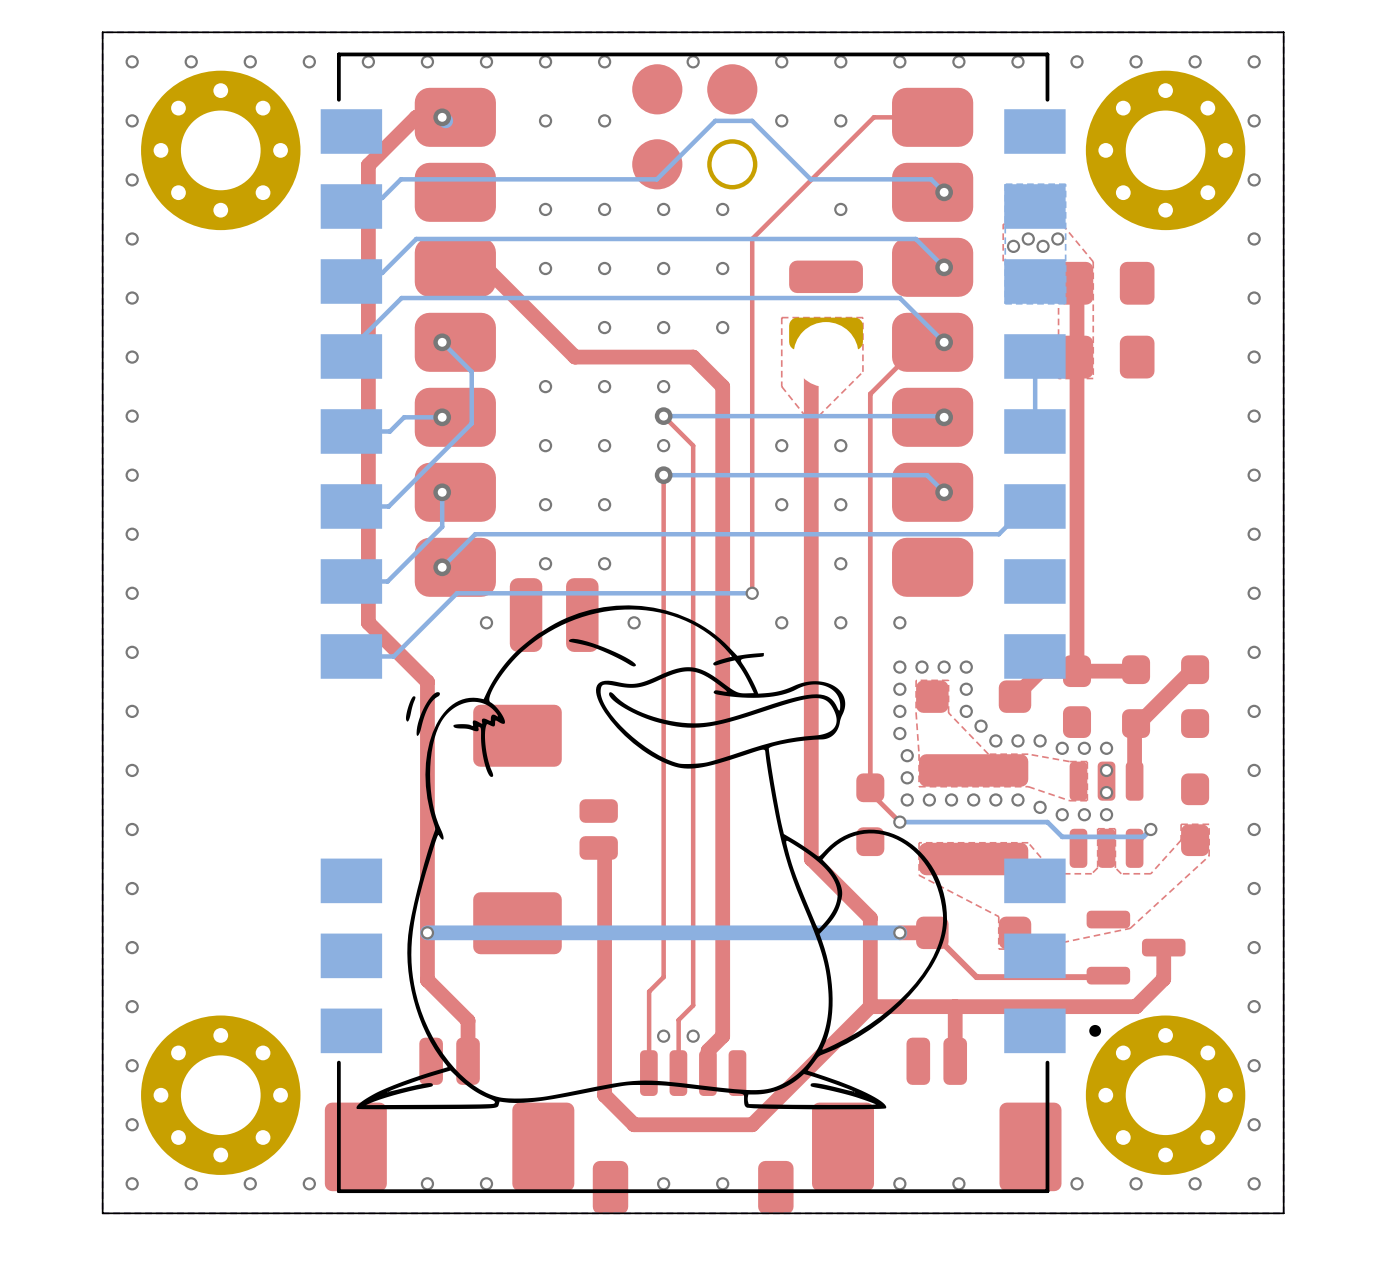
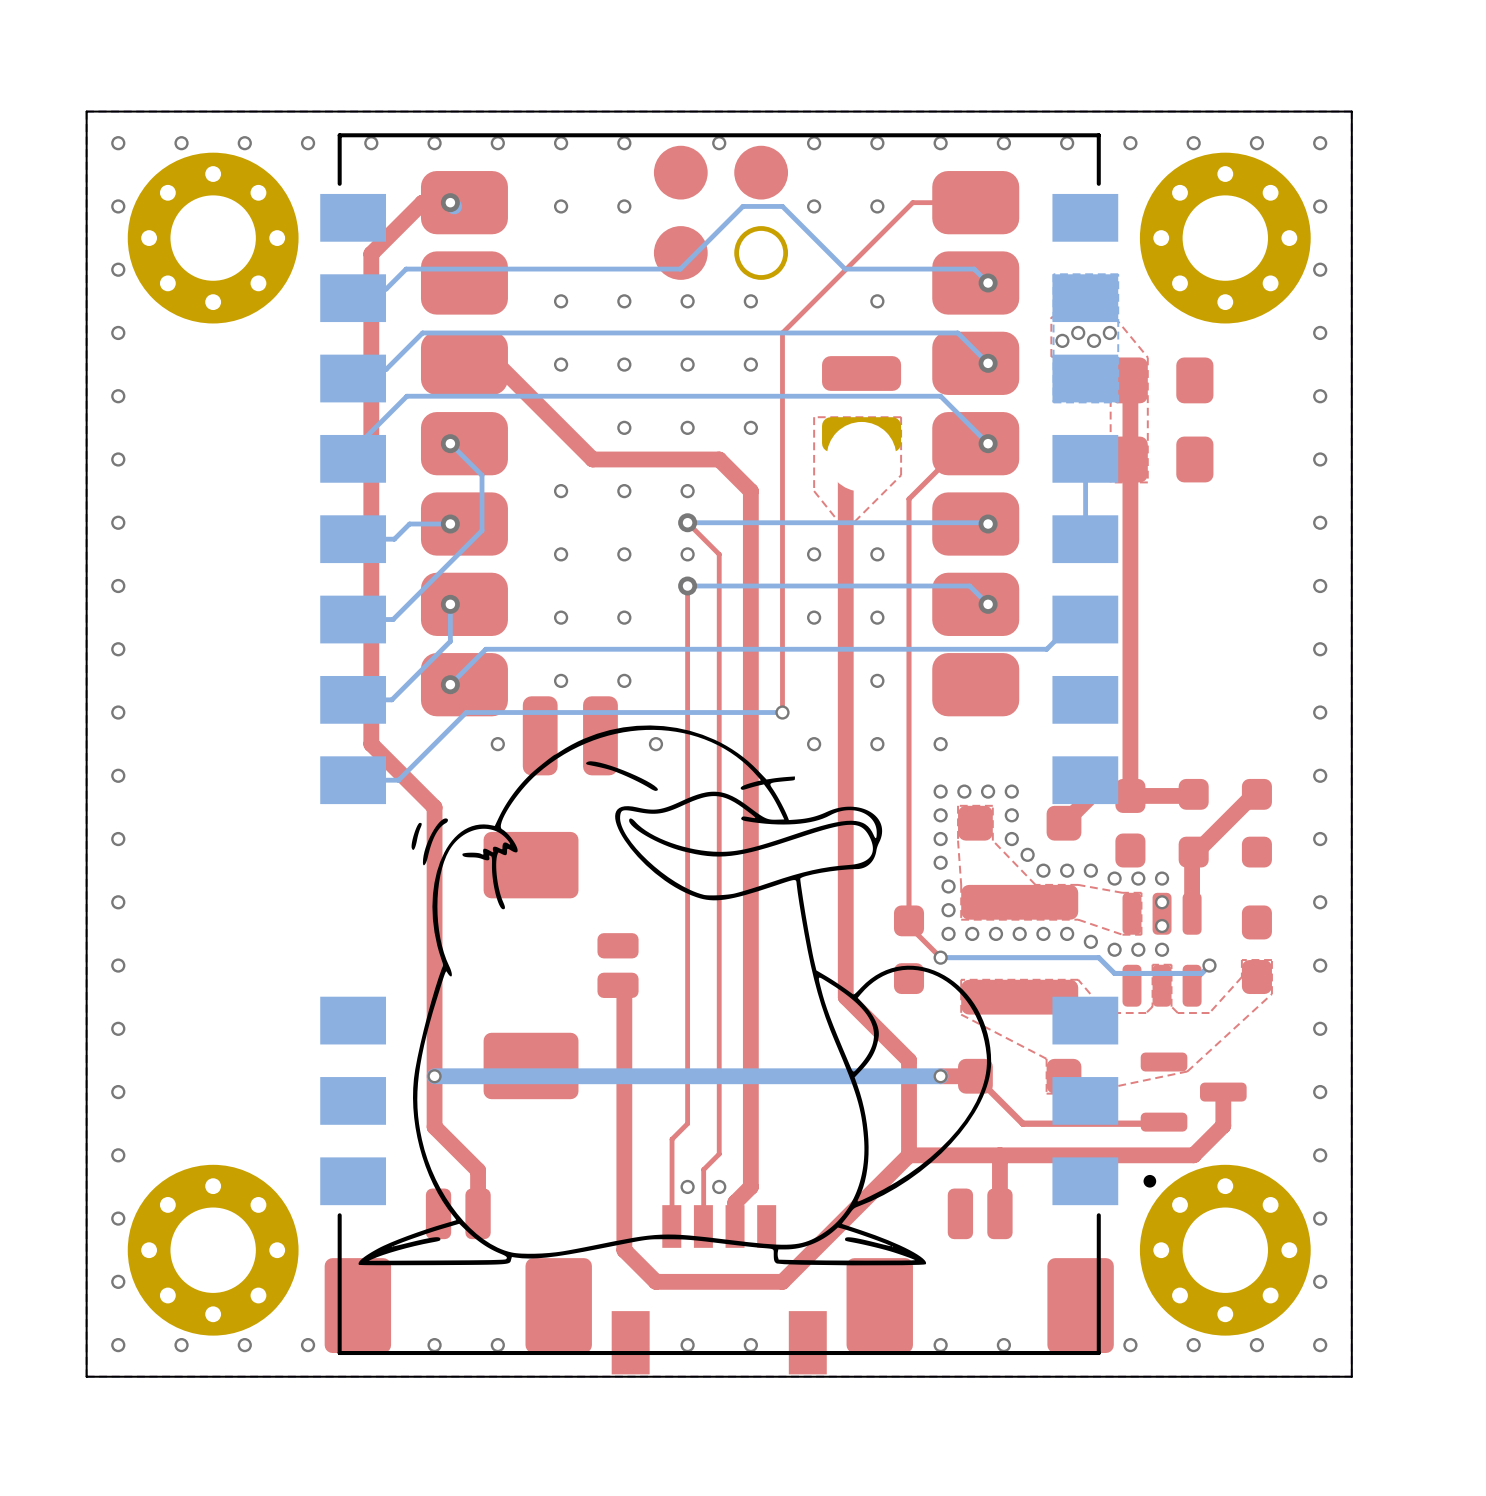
part footprint: [592, 1050, 794, 1215] -> [611, 1205, 827, 1375]

